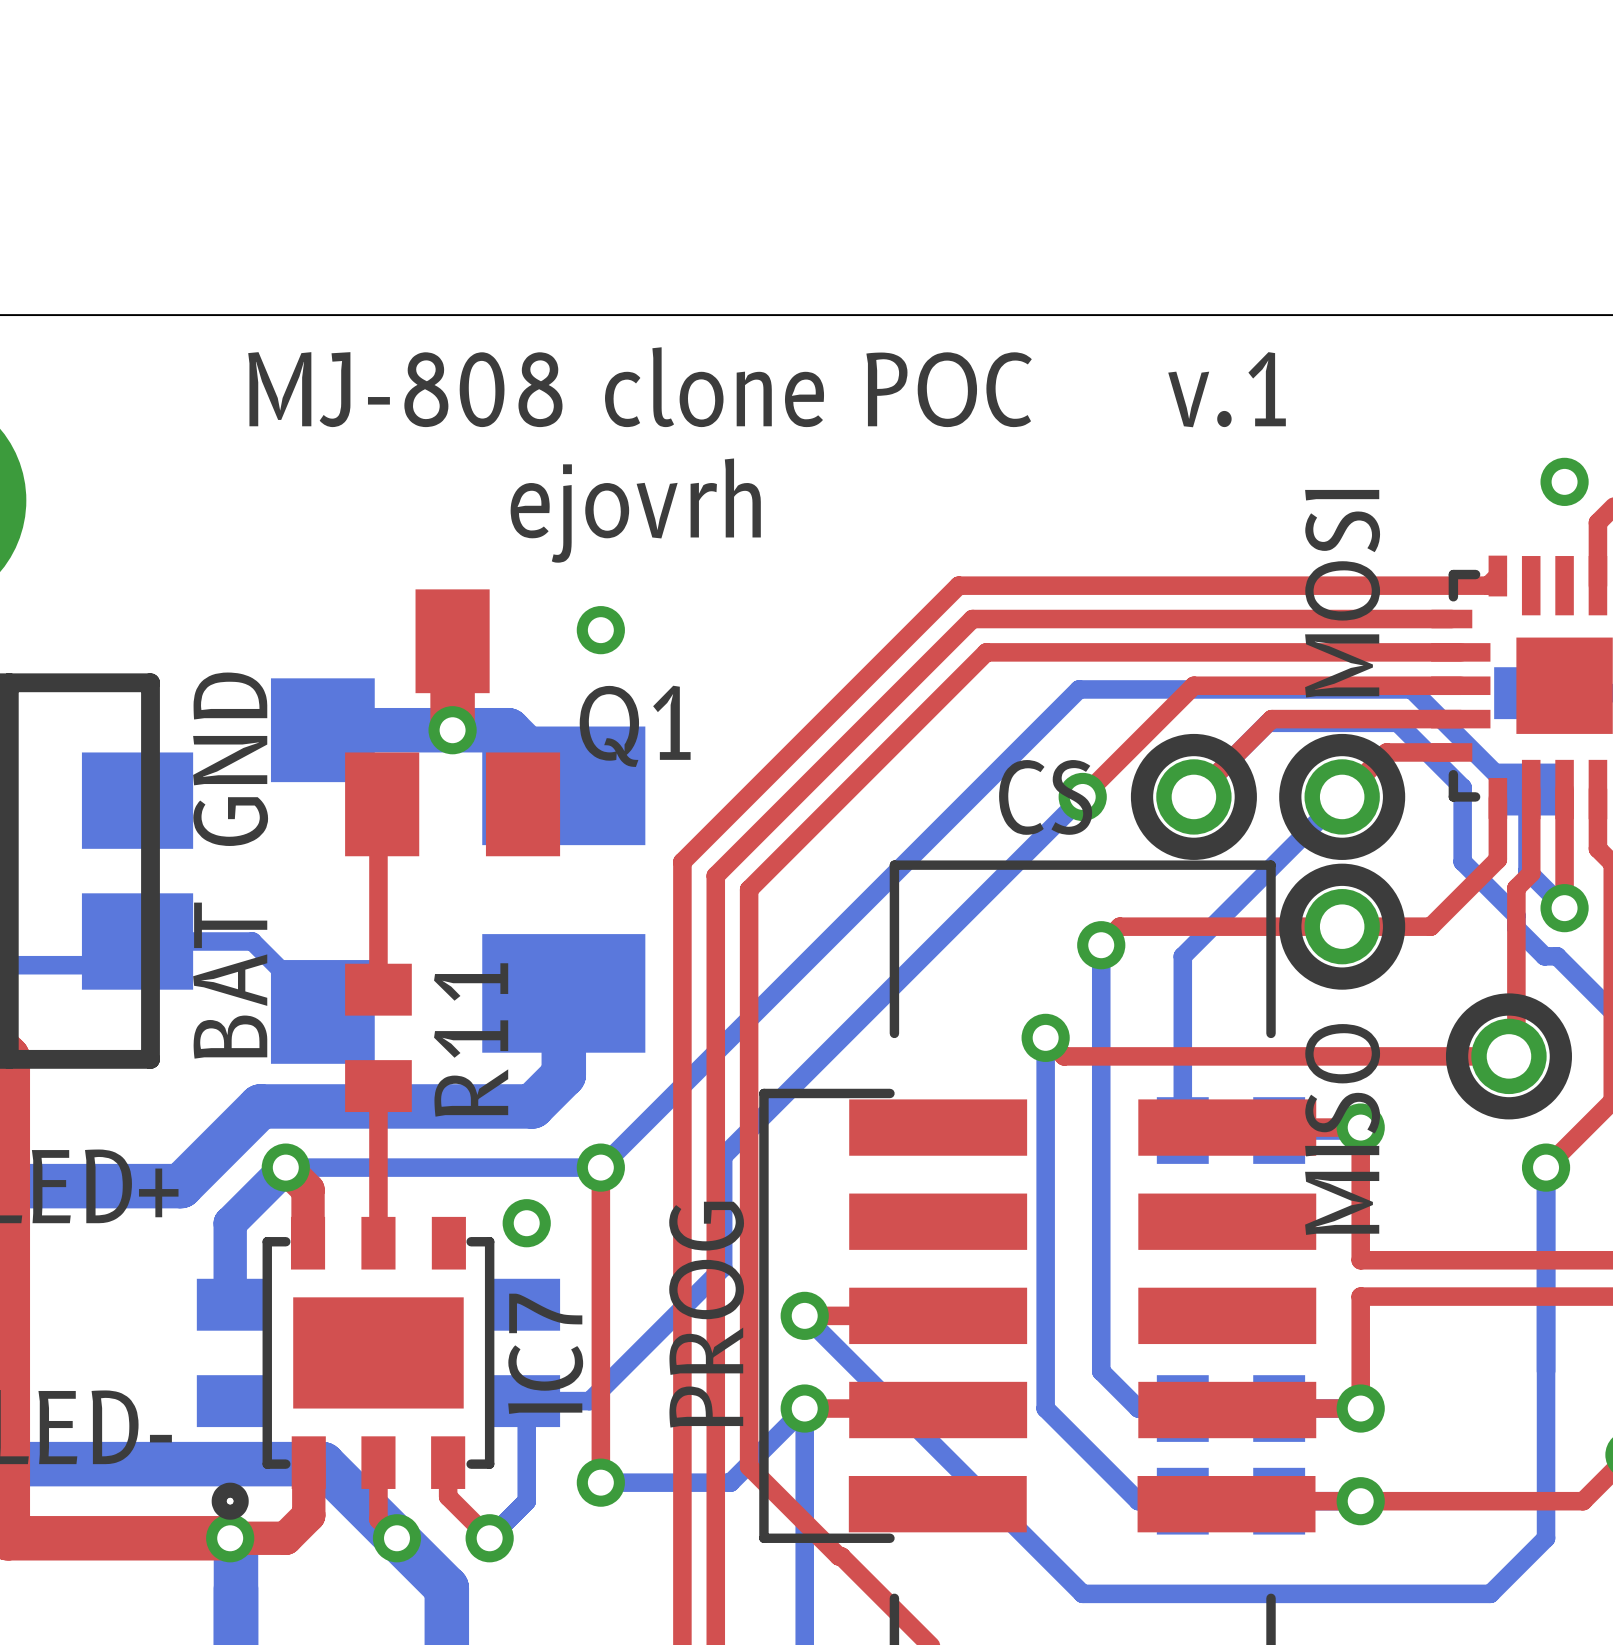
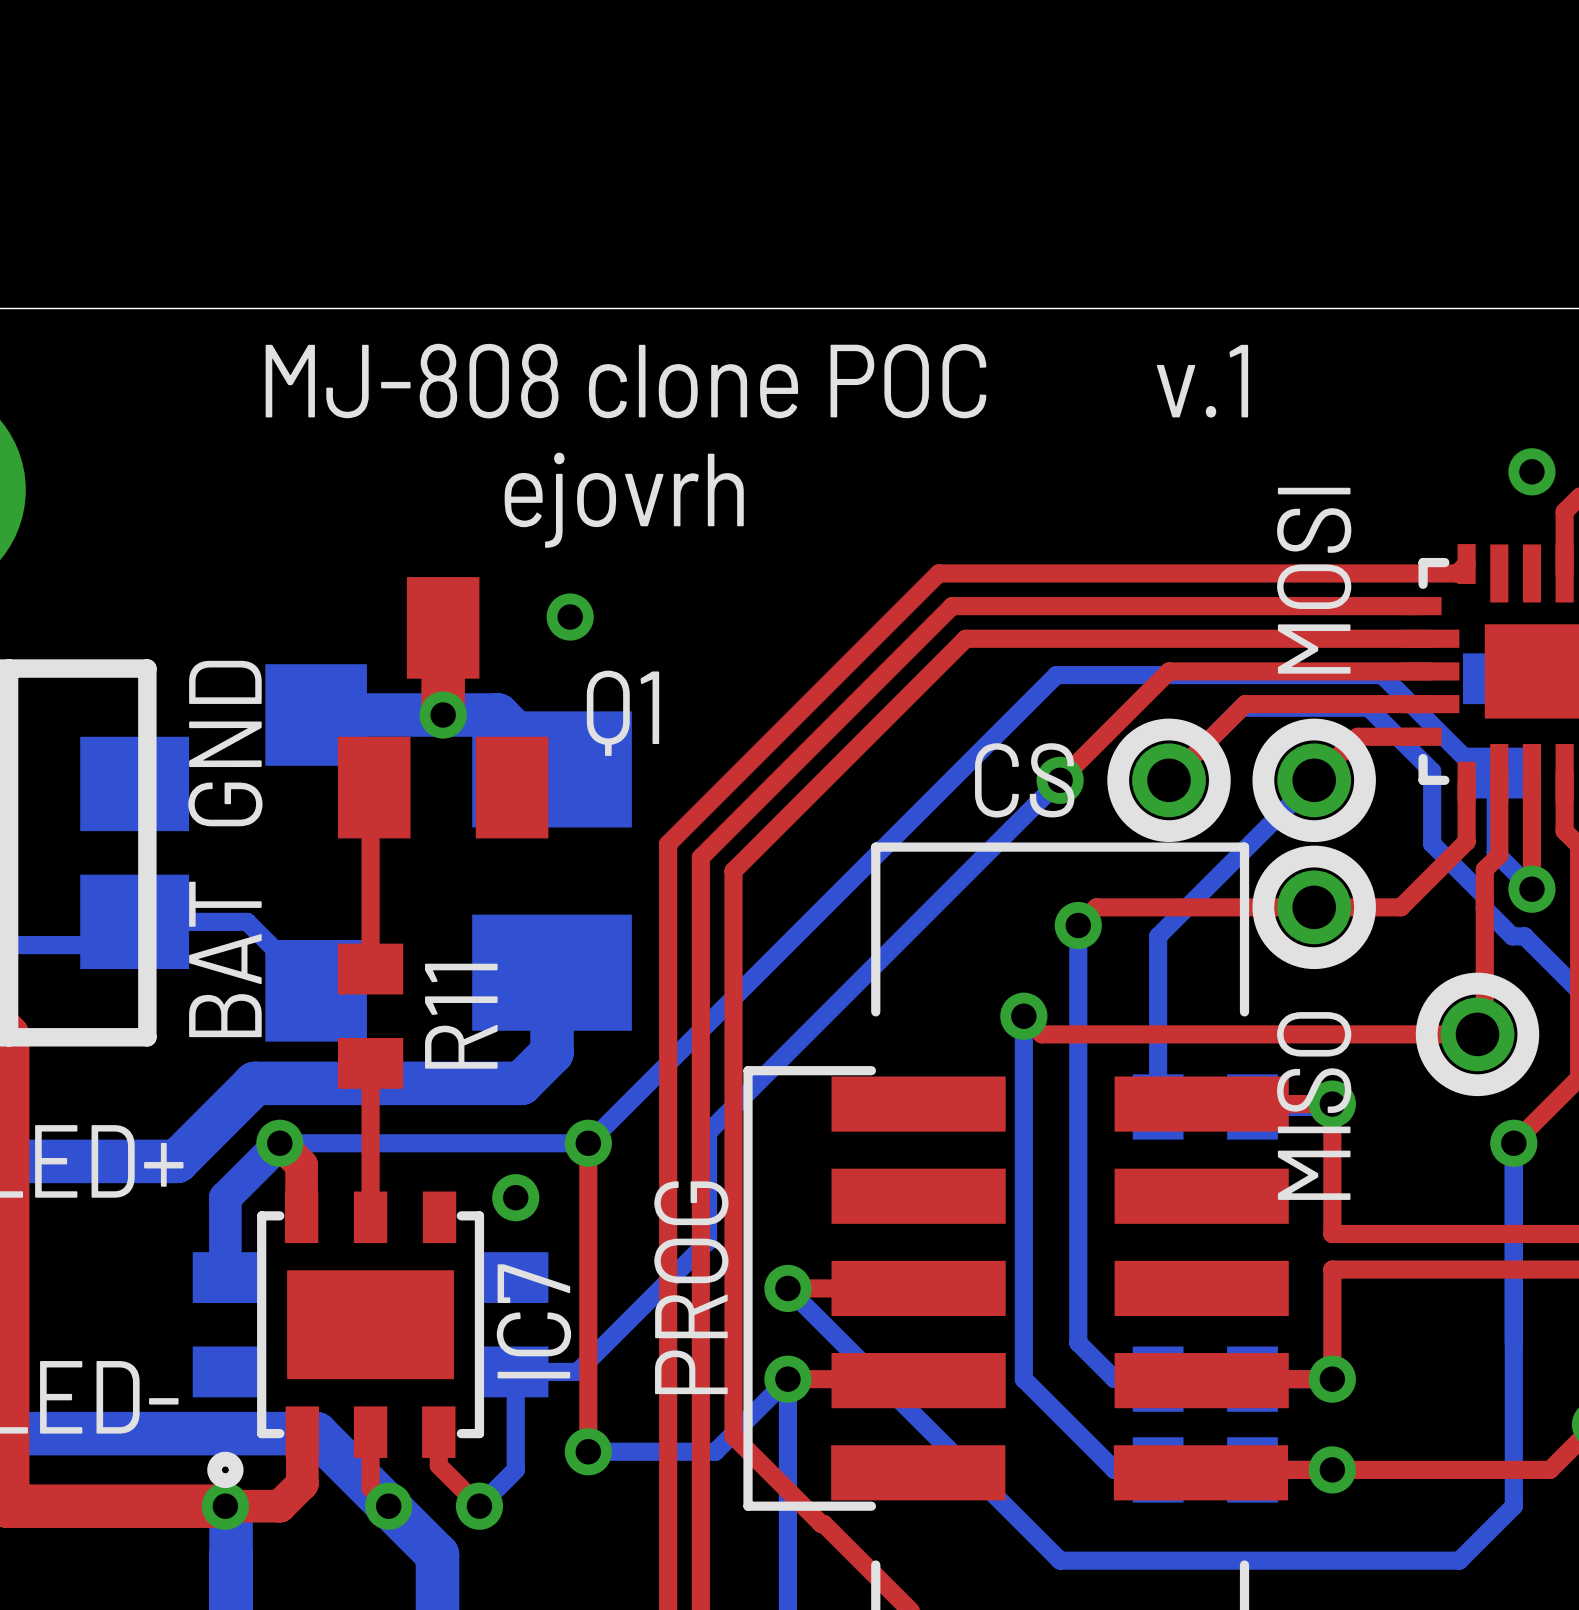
via position: (600, 630) -> (570, 617)

